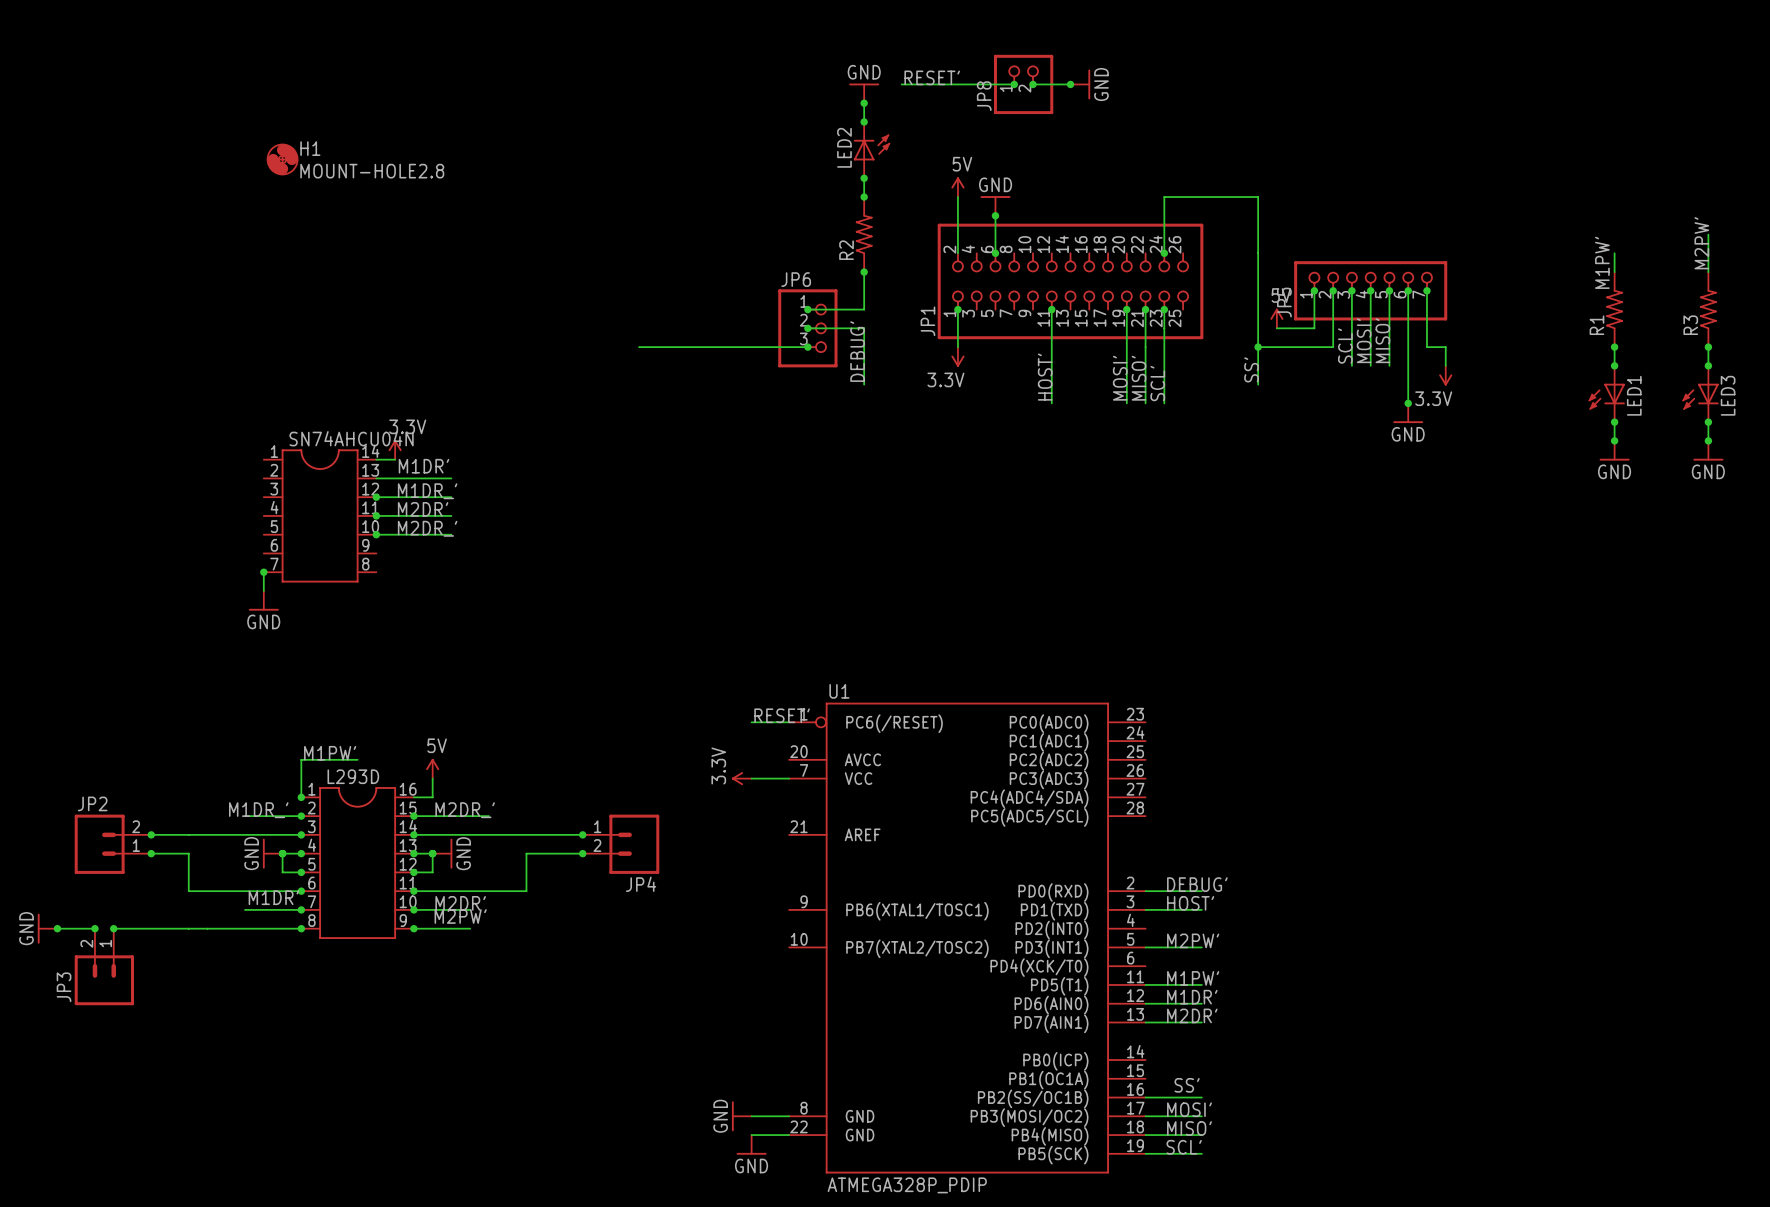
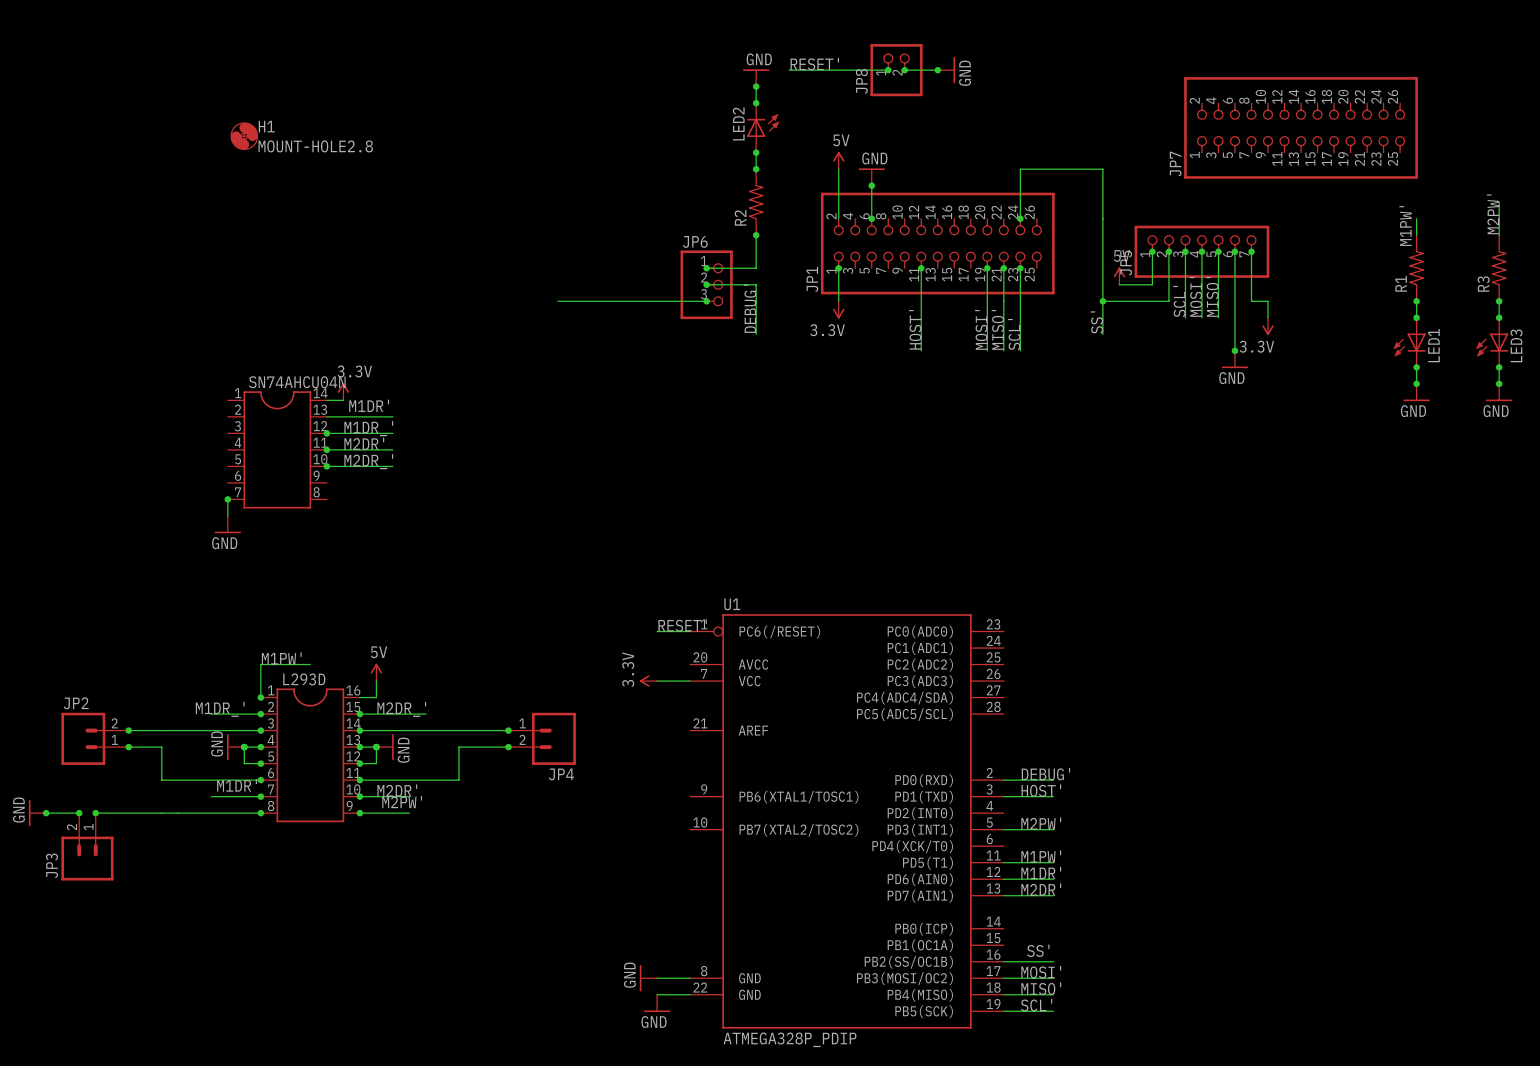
JP7: none -> (1301, 127)

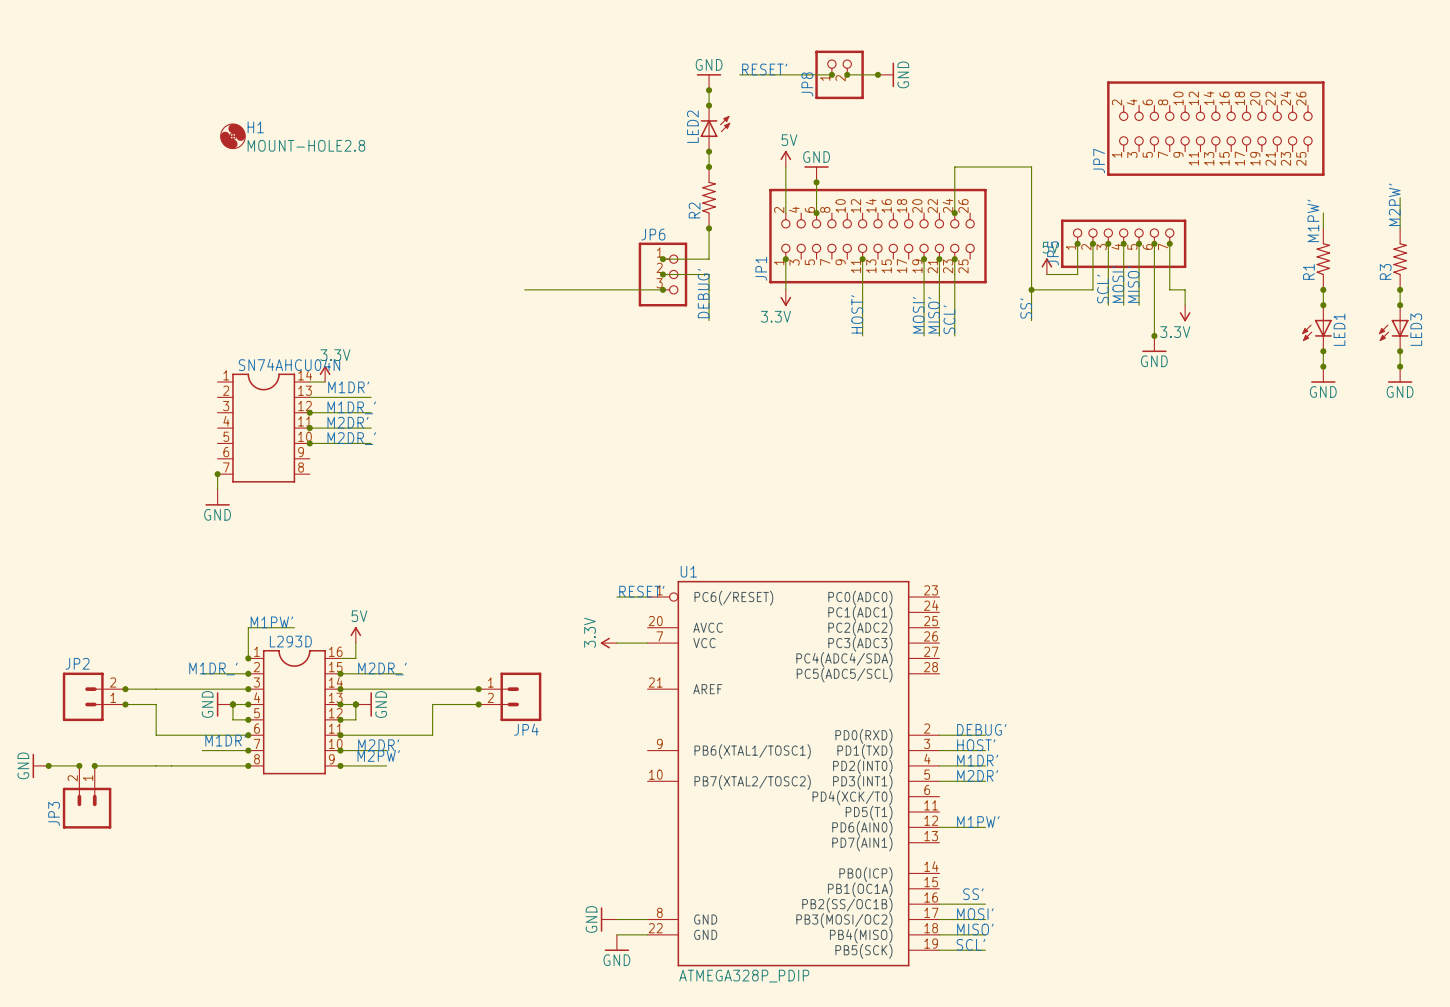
text: none -> M1DR' (977, 760)
text: M2PW' (1041, 823) -> M2DR' (977, 775)
text: M1PW' (1041, 856) -> none
wire: (1003, 862) (1053, 862) -> (939, 765) (985, 765)
text: M1DR' (1041, 873) -> M1PW' (978, 821)
text: M2DR' (1041, 889) -> none
wire: (1003, 895) (1053, 895) -> none

